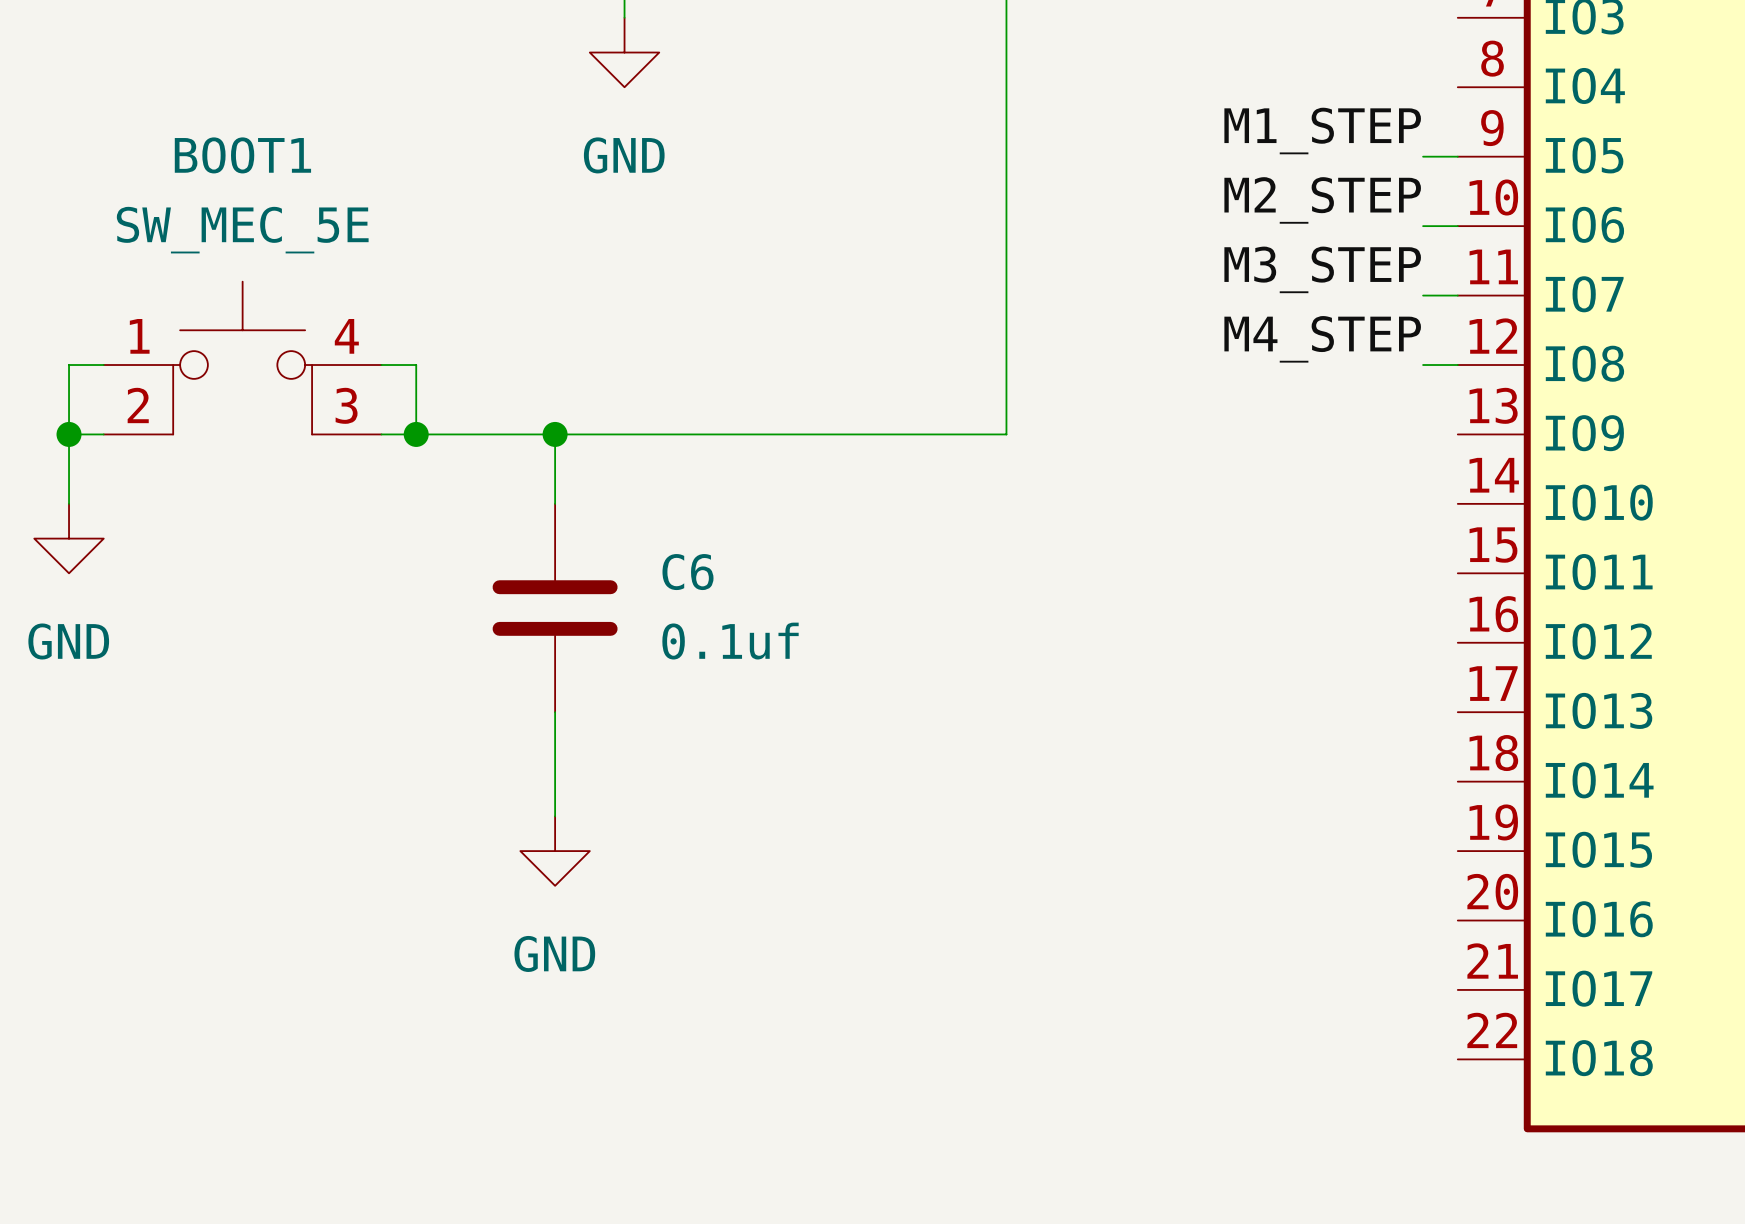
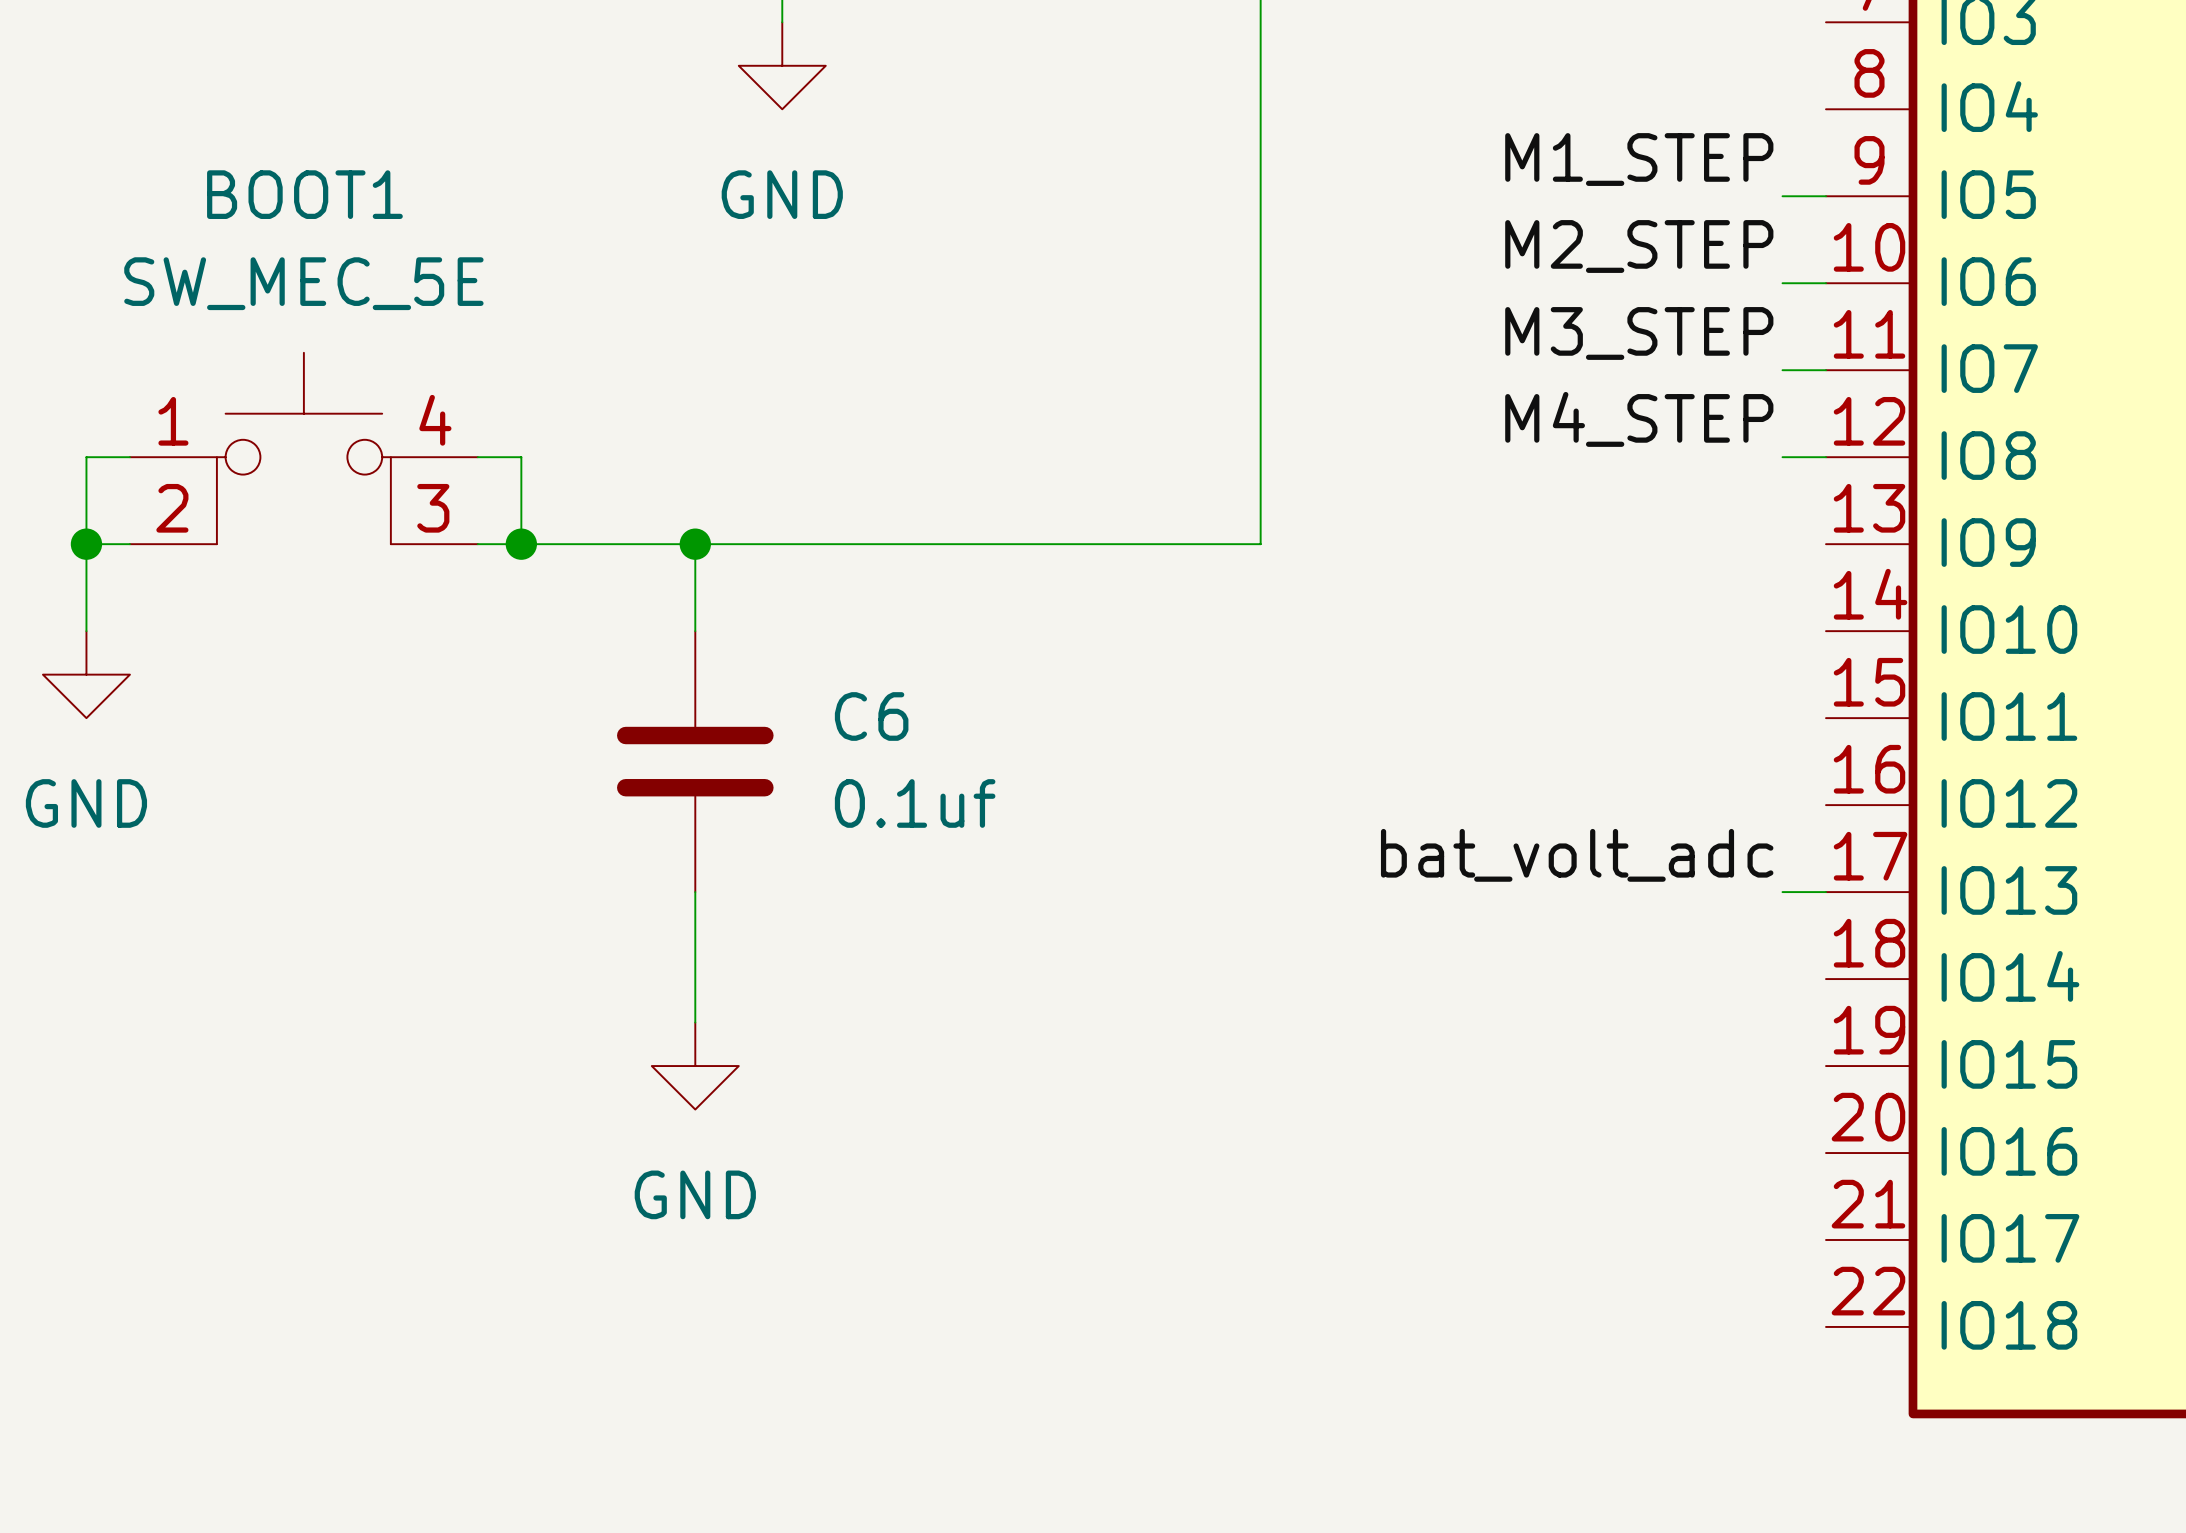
label: none -> bat_volt_adc (1577, 855)
wire: none -> (1782, 892) (1826, 892)

